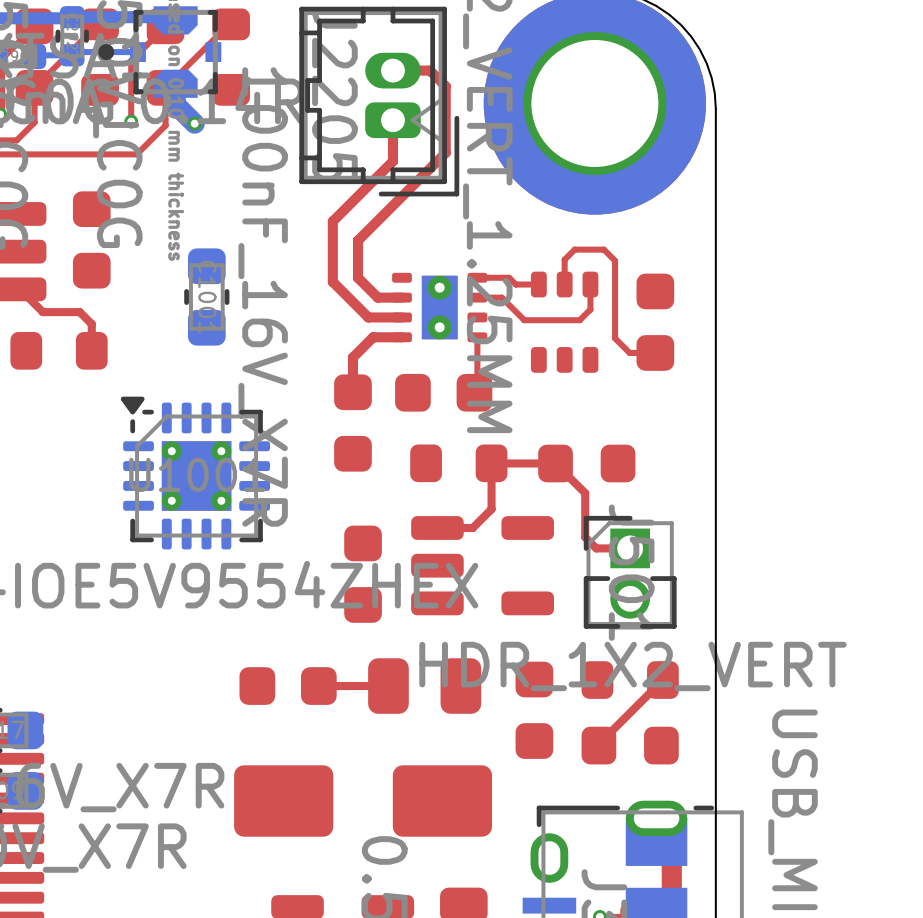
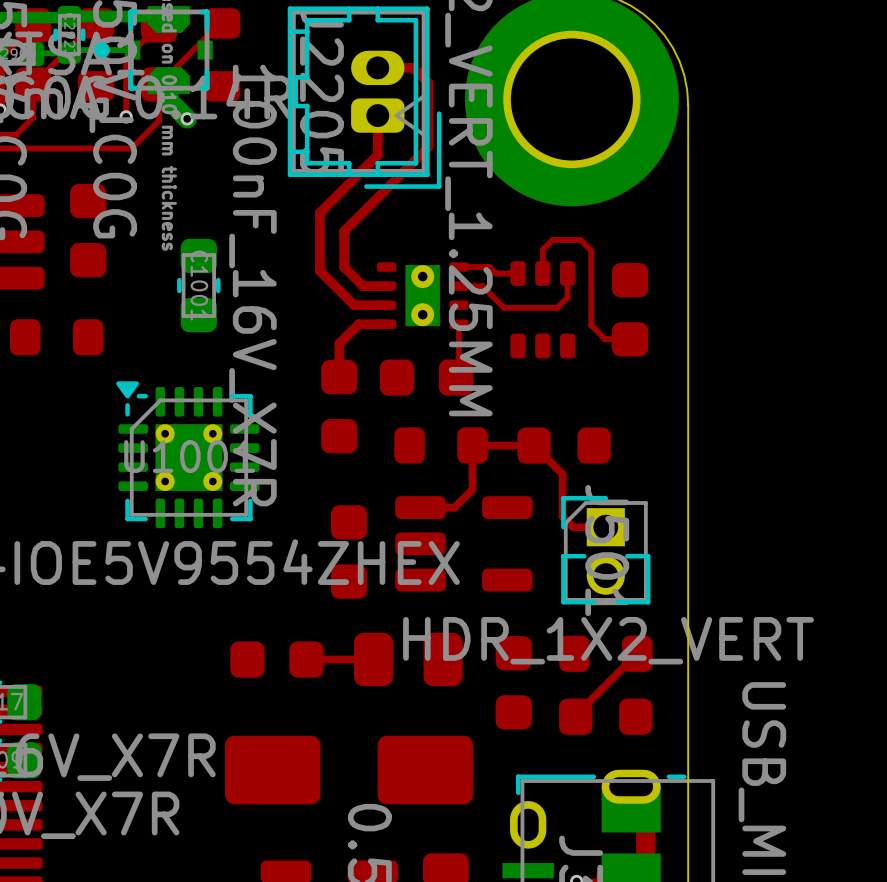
top track: (20, 289) (42, 312) (79, 312) (91, 324) (91, 350) -> none

